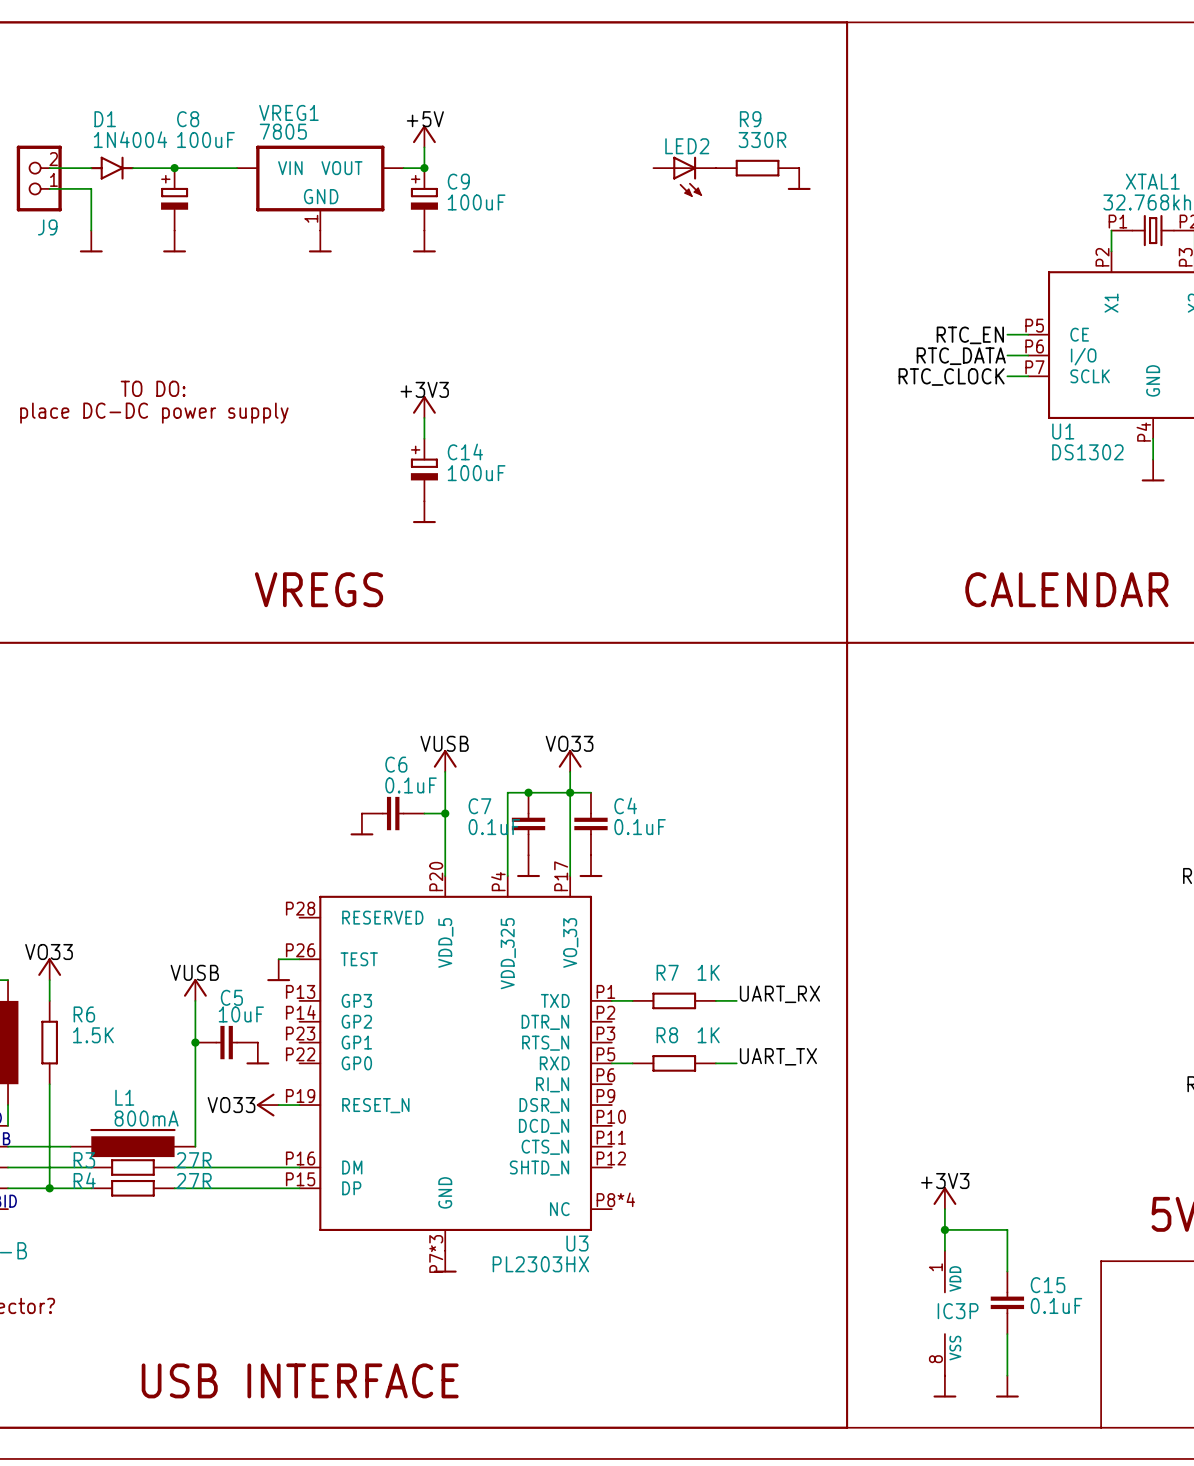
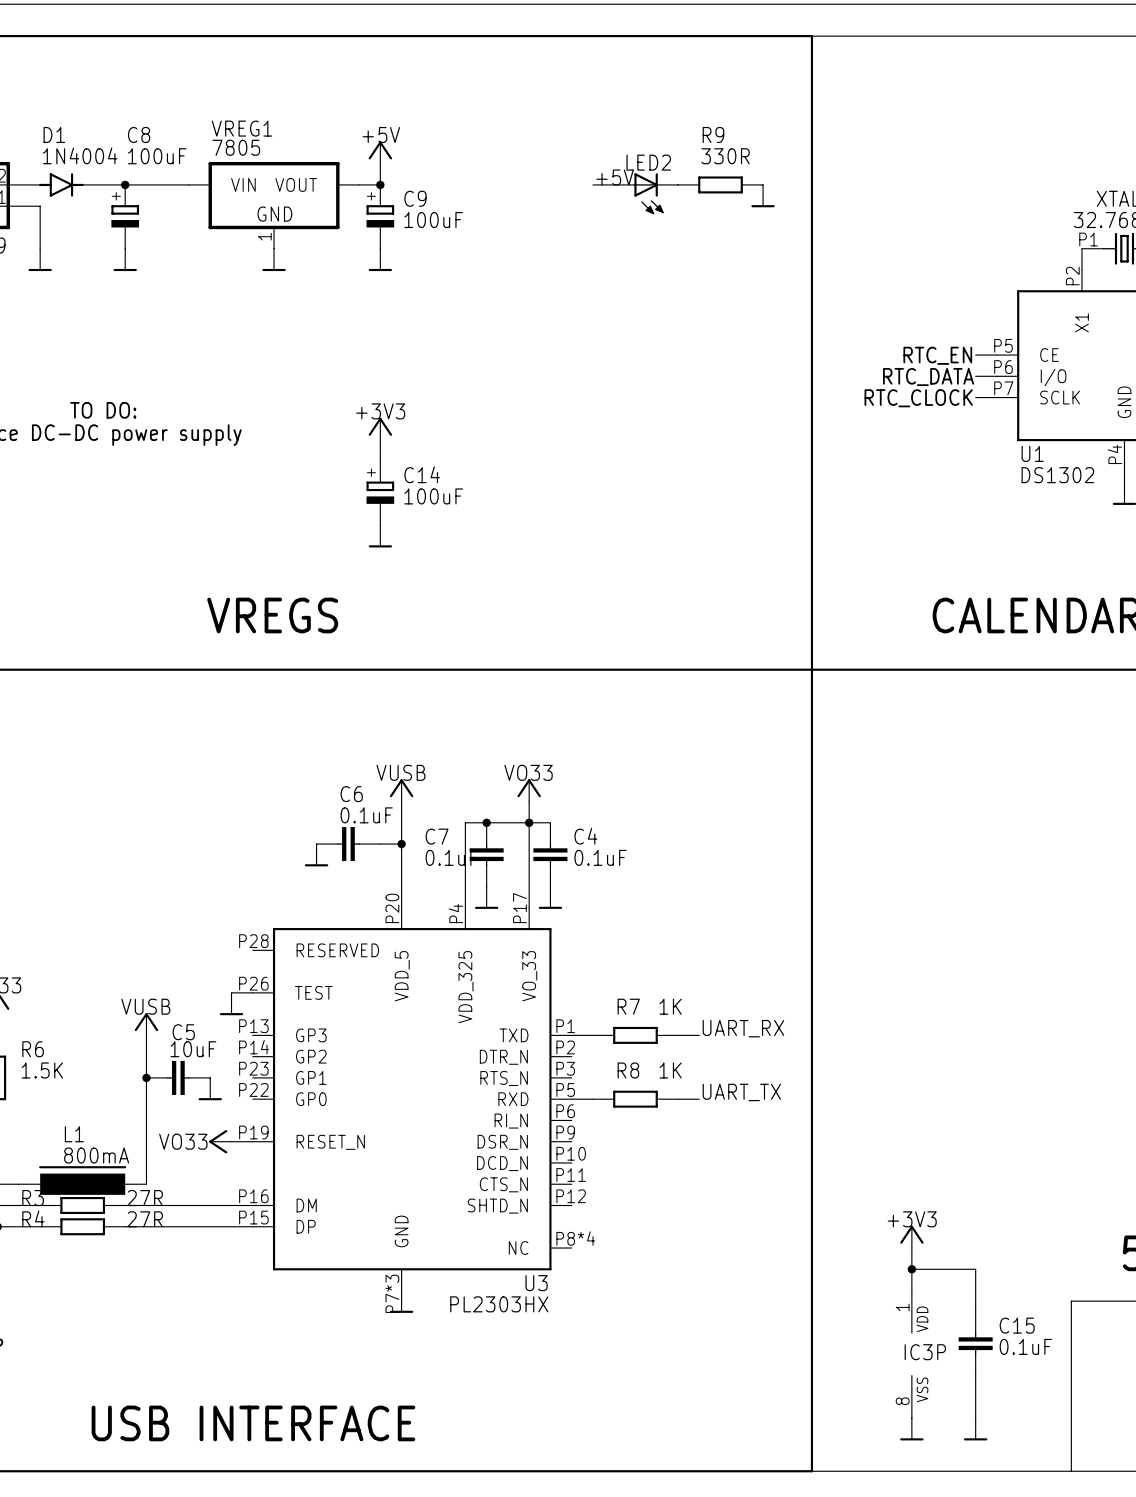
label: none -> +5V (615, 177)
wire: none -> (592, 184) (614, 184)

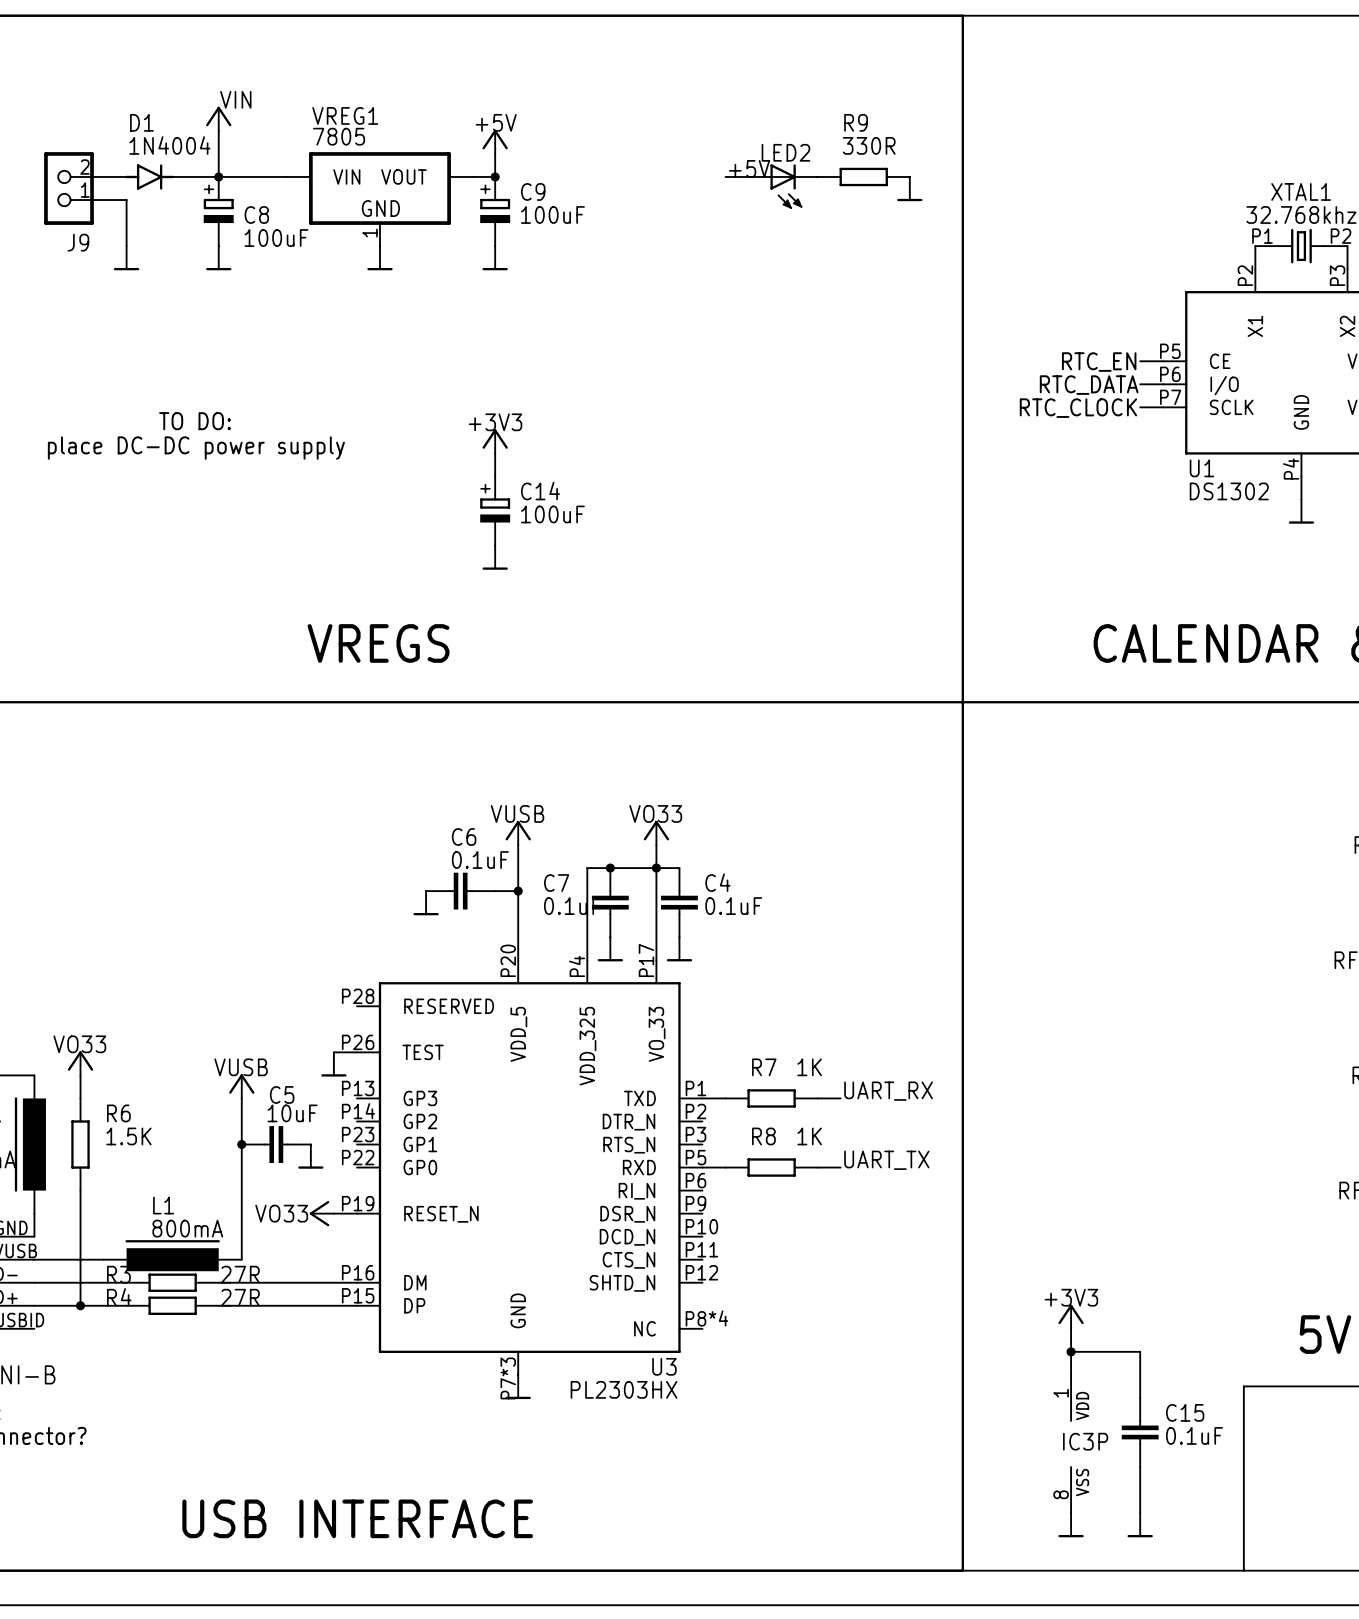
label: none -> VIN (235, 99)
power symbol: none -> (218, 118)
C8 name position: C8 (139, 134) -> C8 (256, 214)
wire: none -> (218, 130) (218, 176)
C8 value position: 100uF (157, 156) -> 100uF (276, 238)

